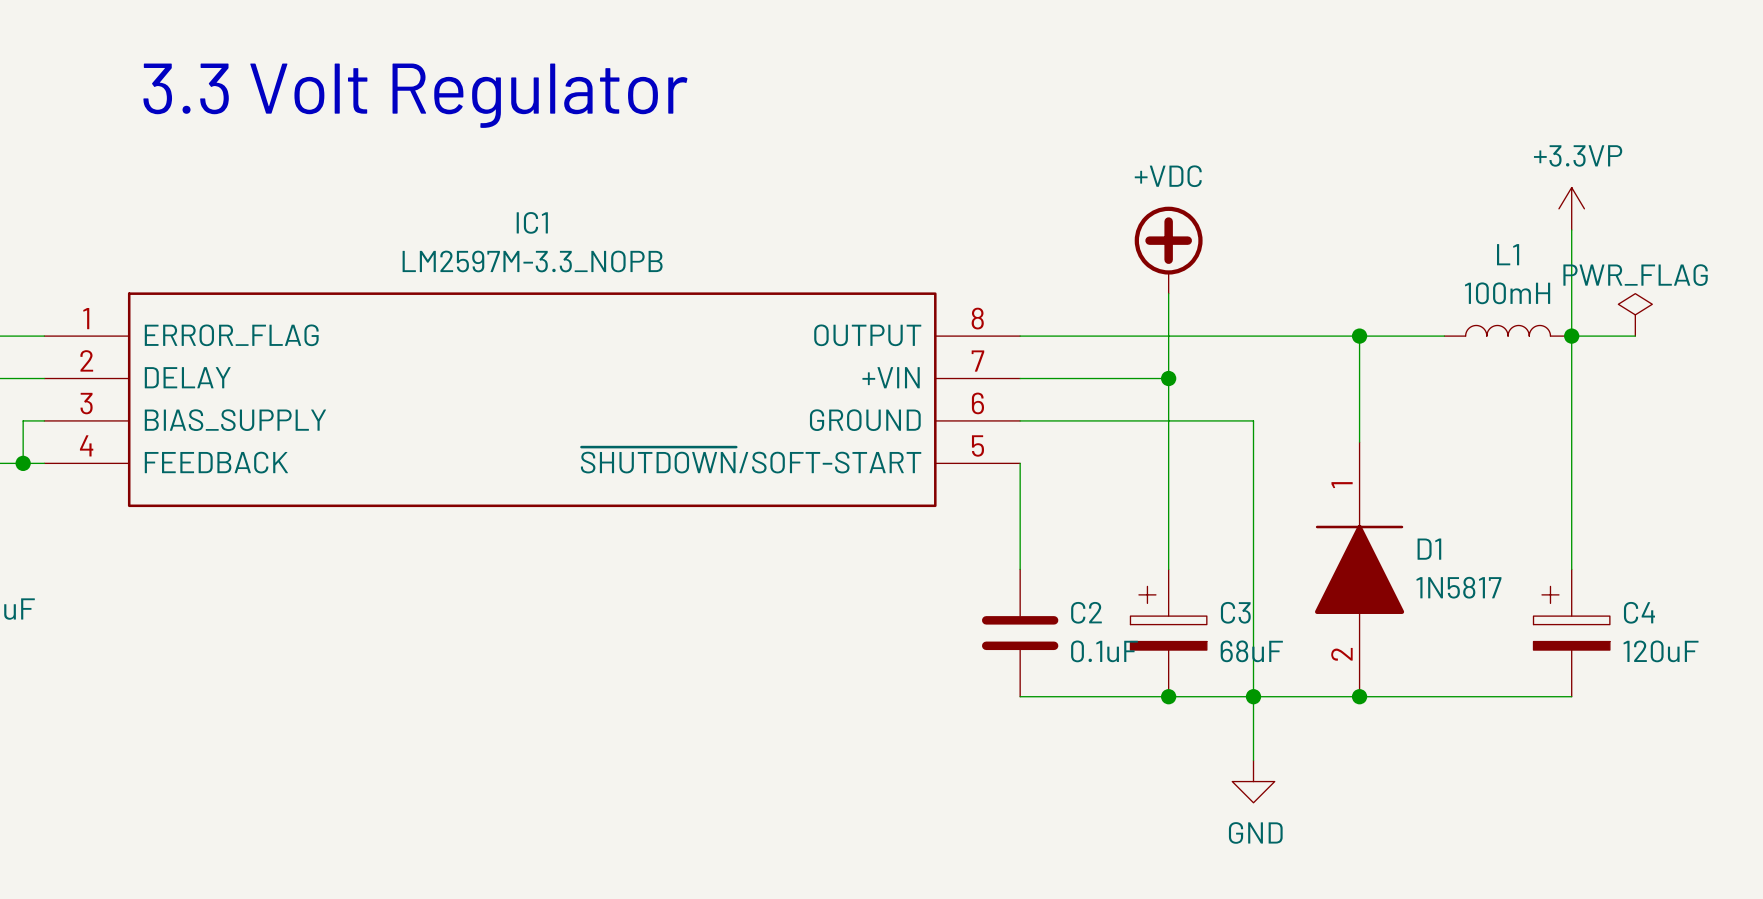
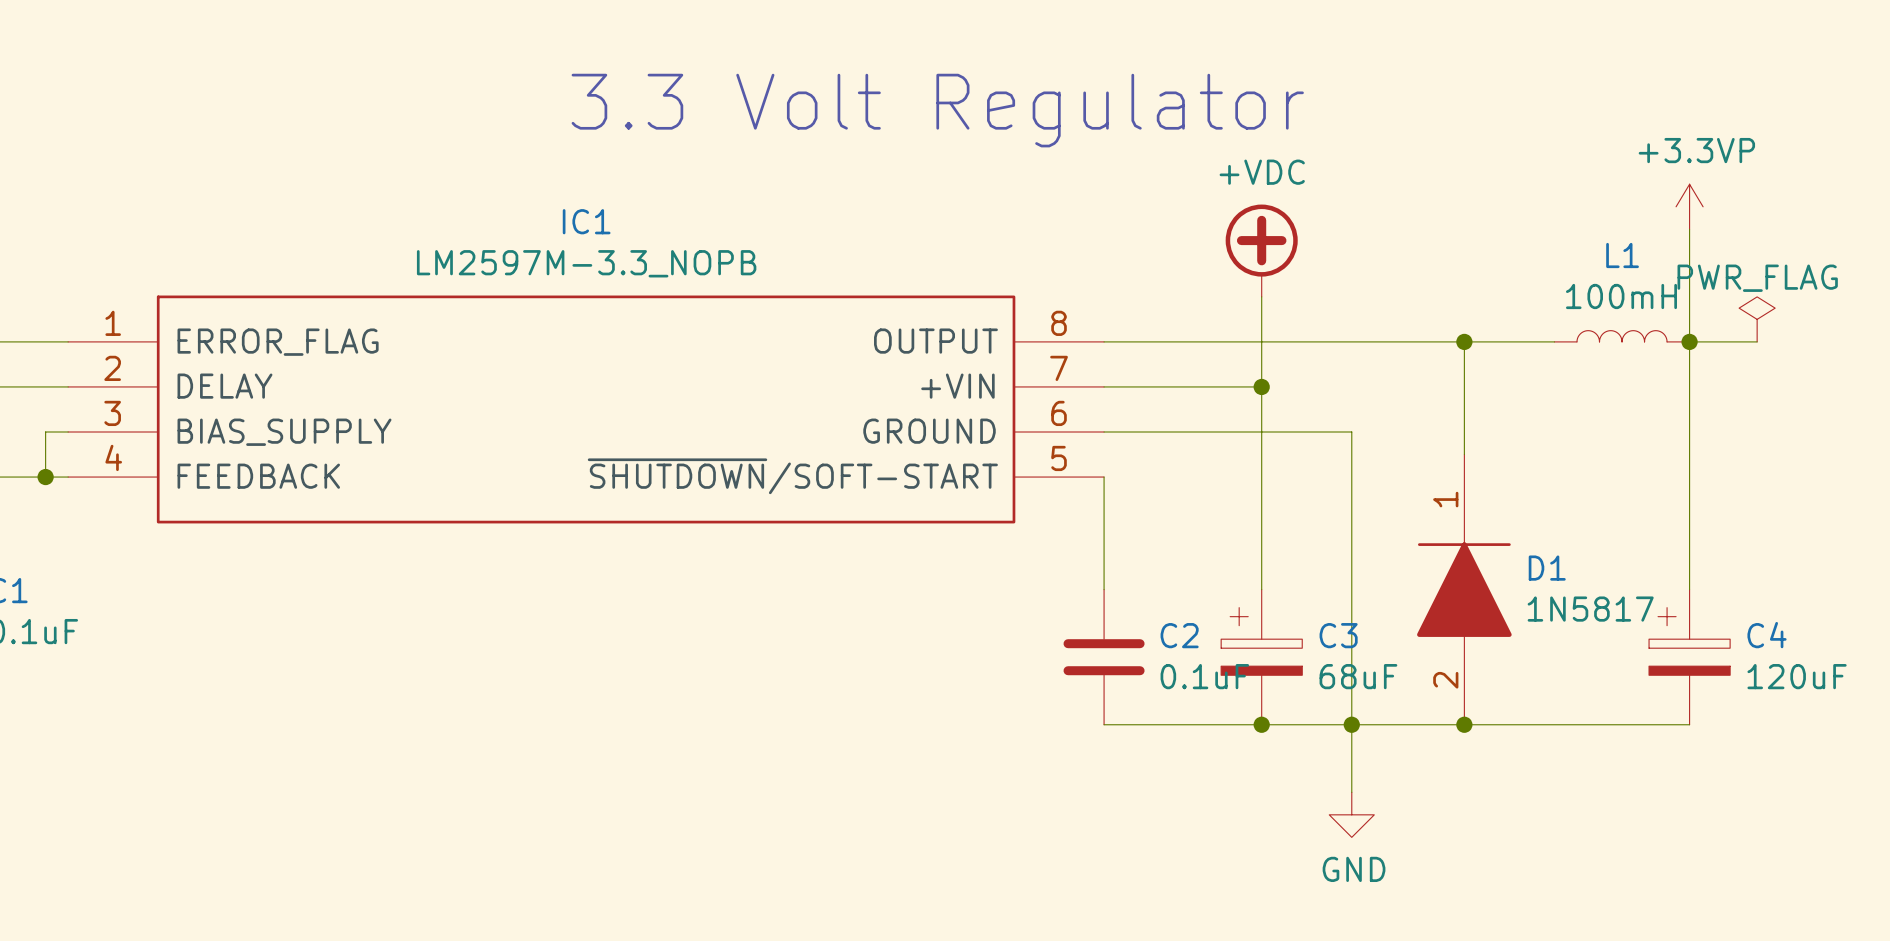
text position: 3.3 Volt Regulator (415, 95) -> 3.3 Volt Regulator (937, 110)

